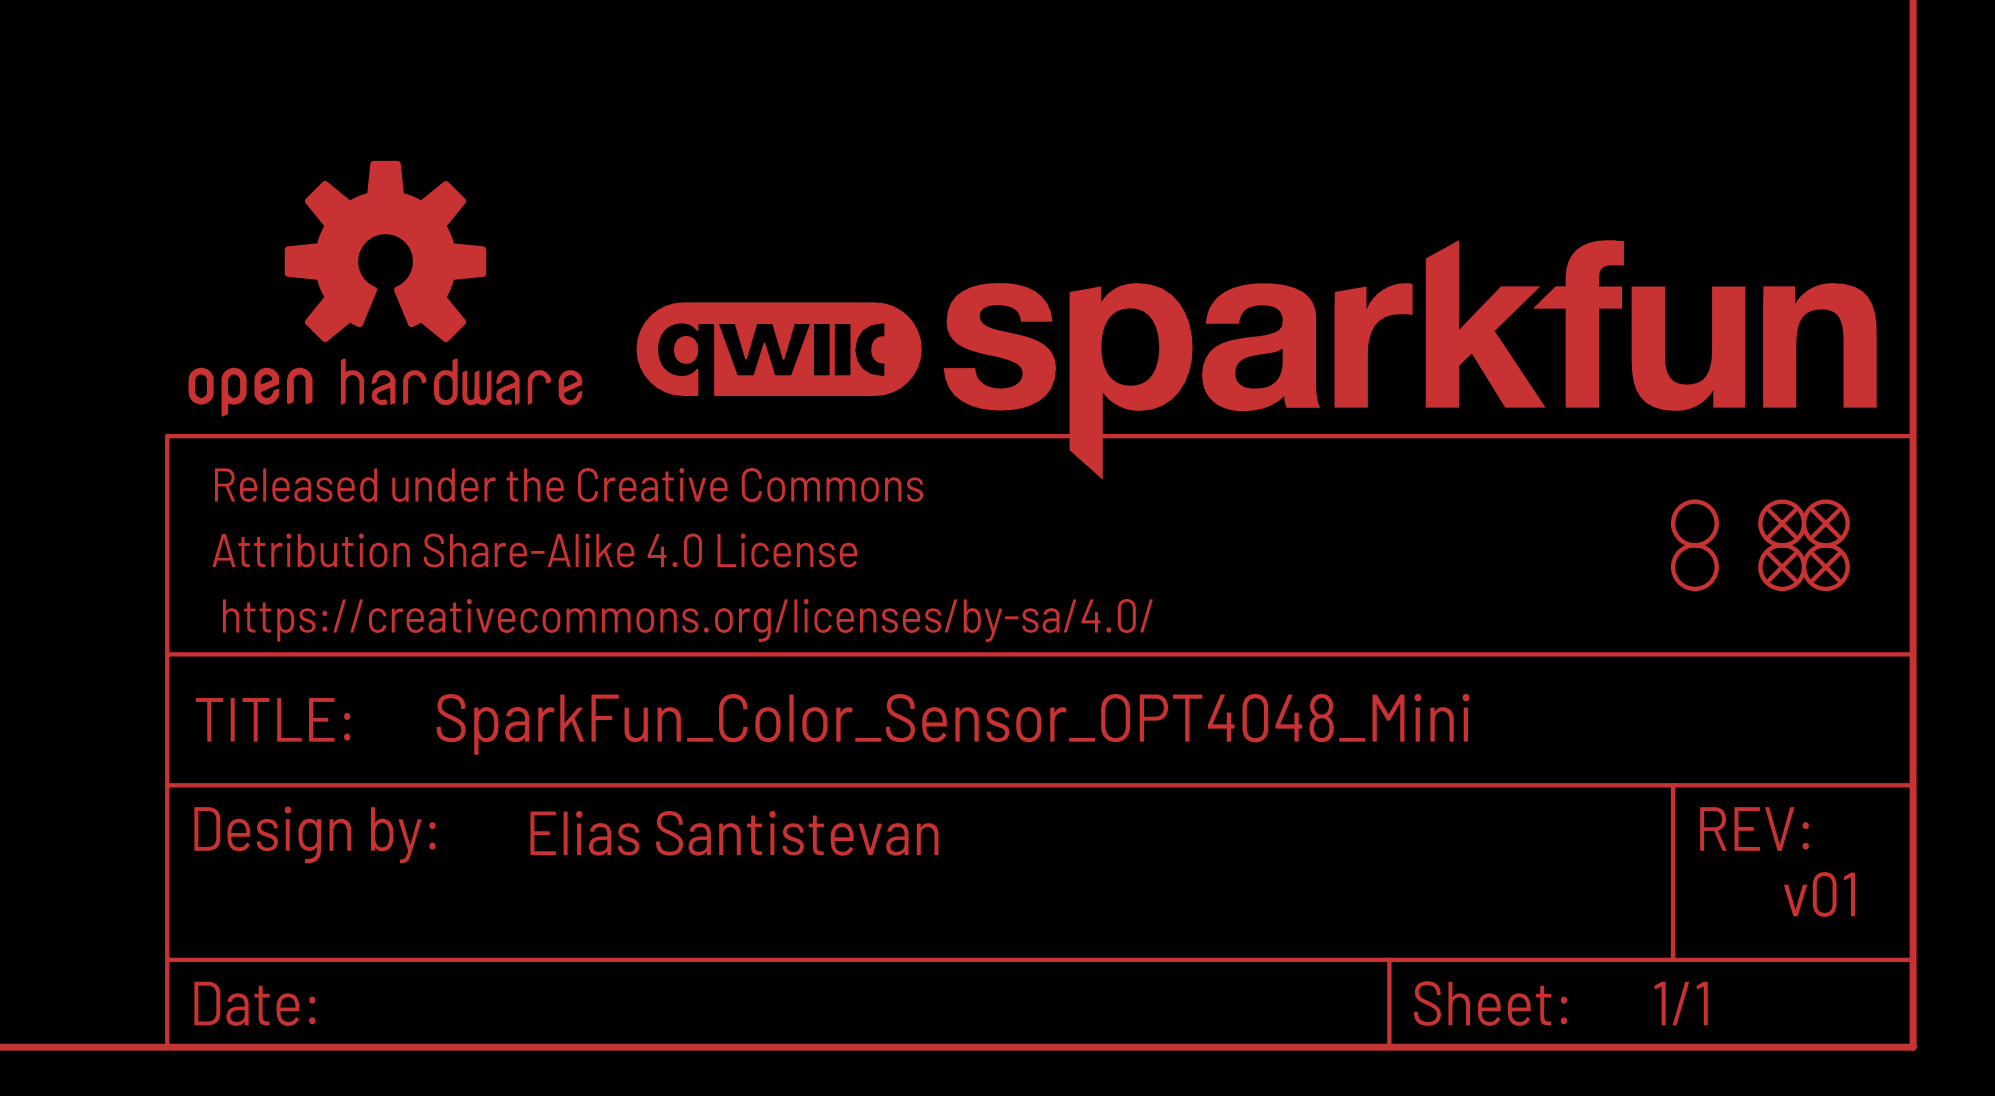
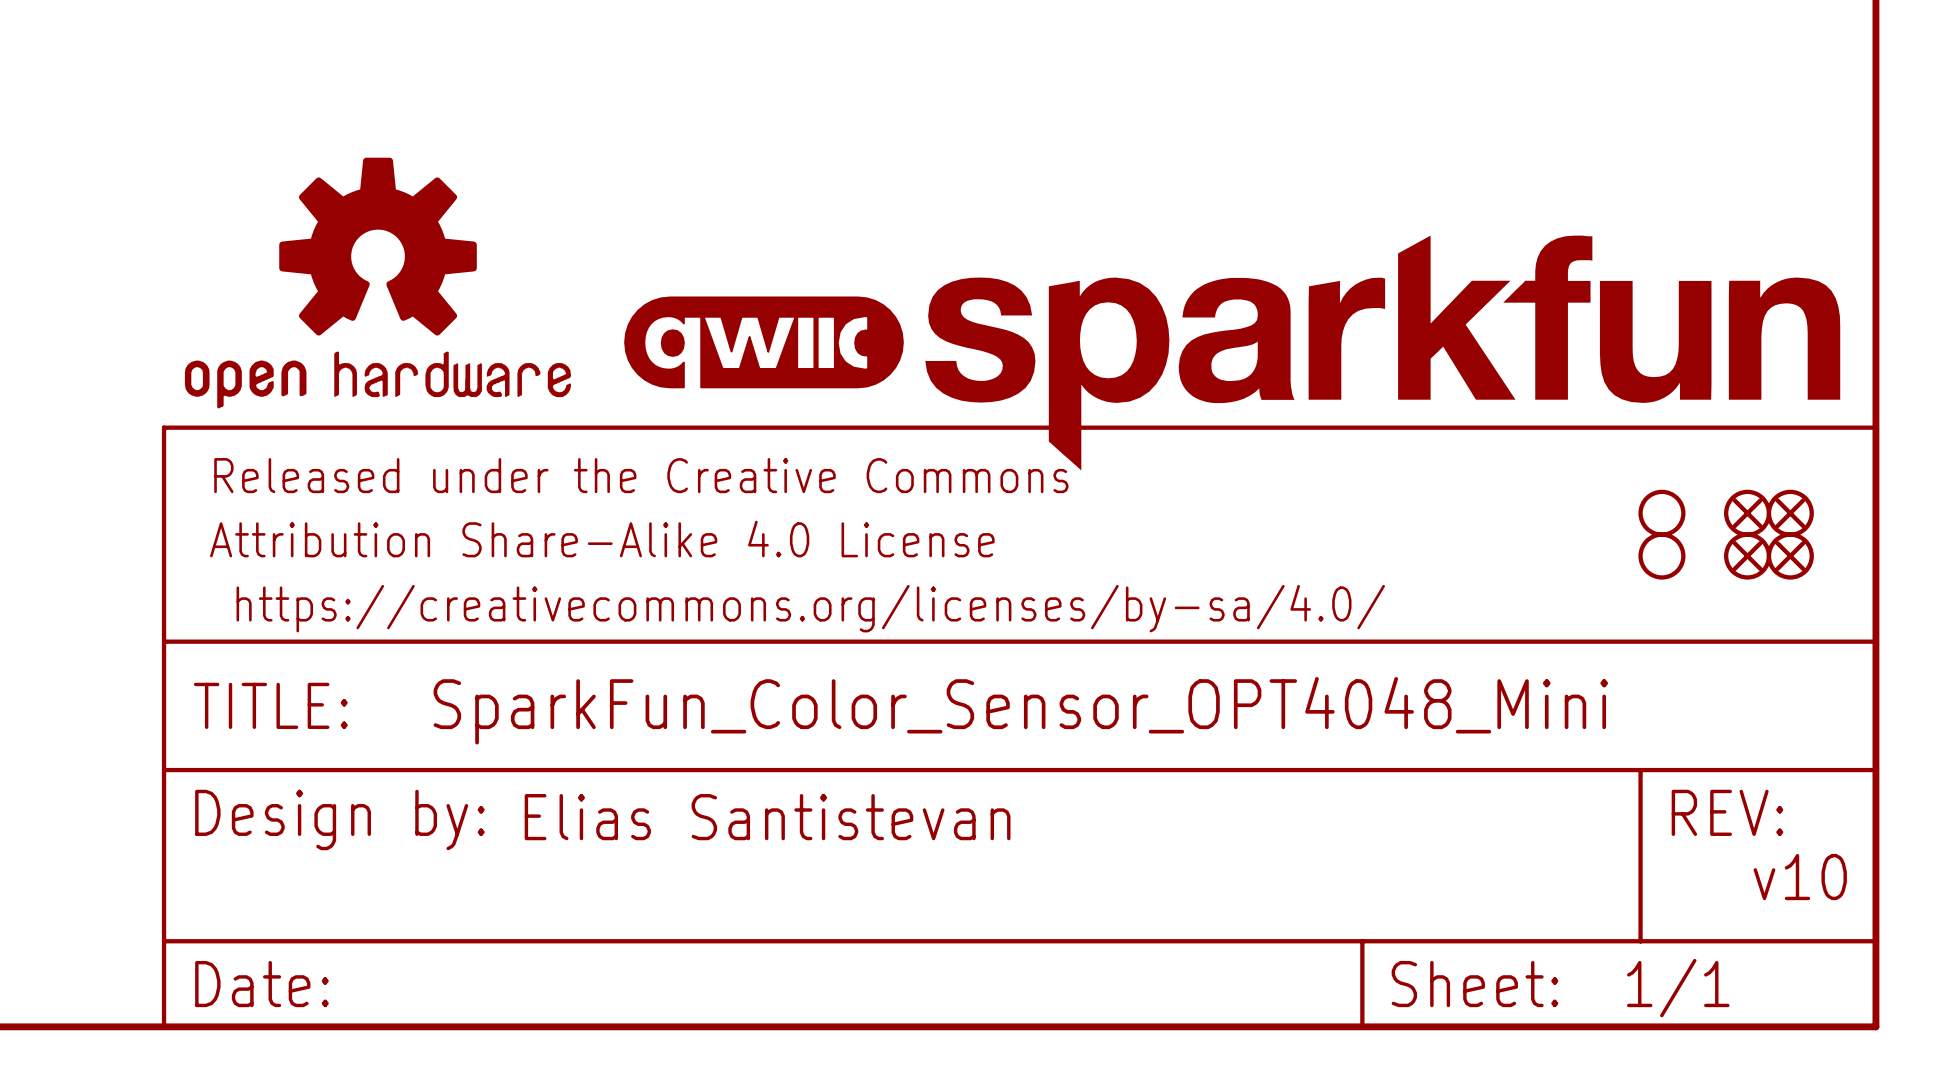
text: v01 (1819, 894) -> v10 (1800, 877)

